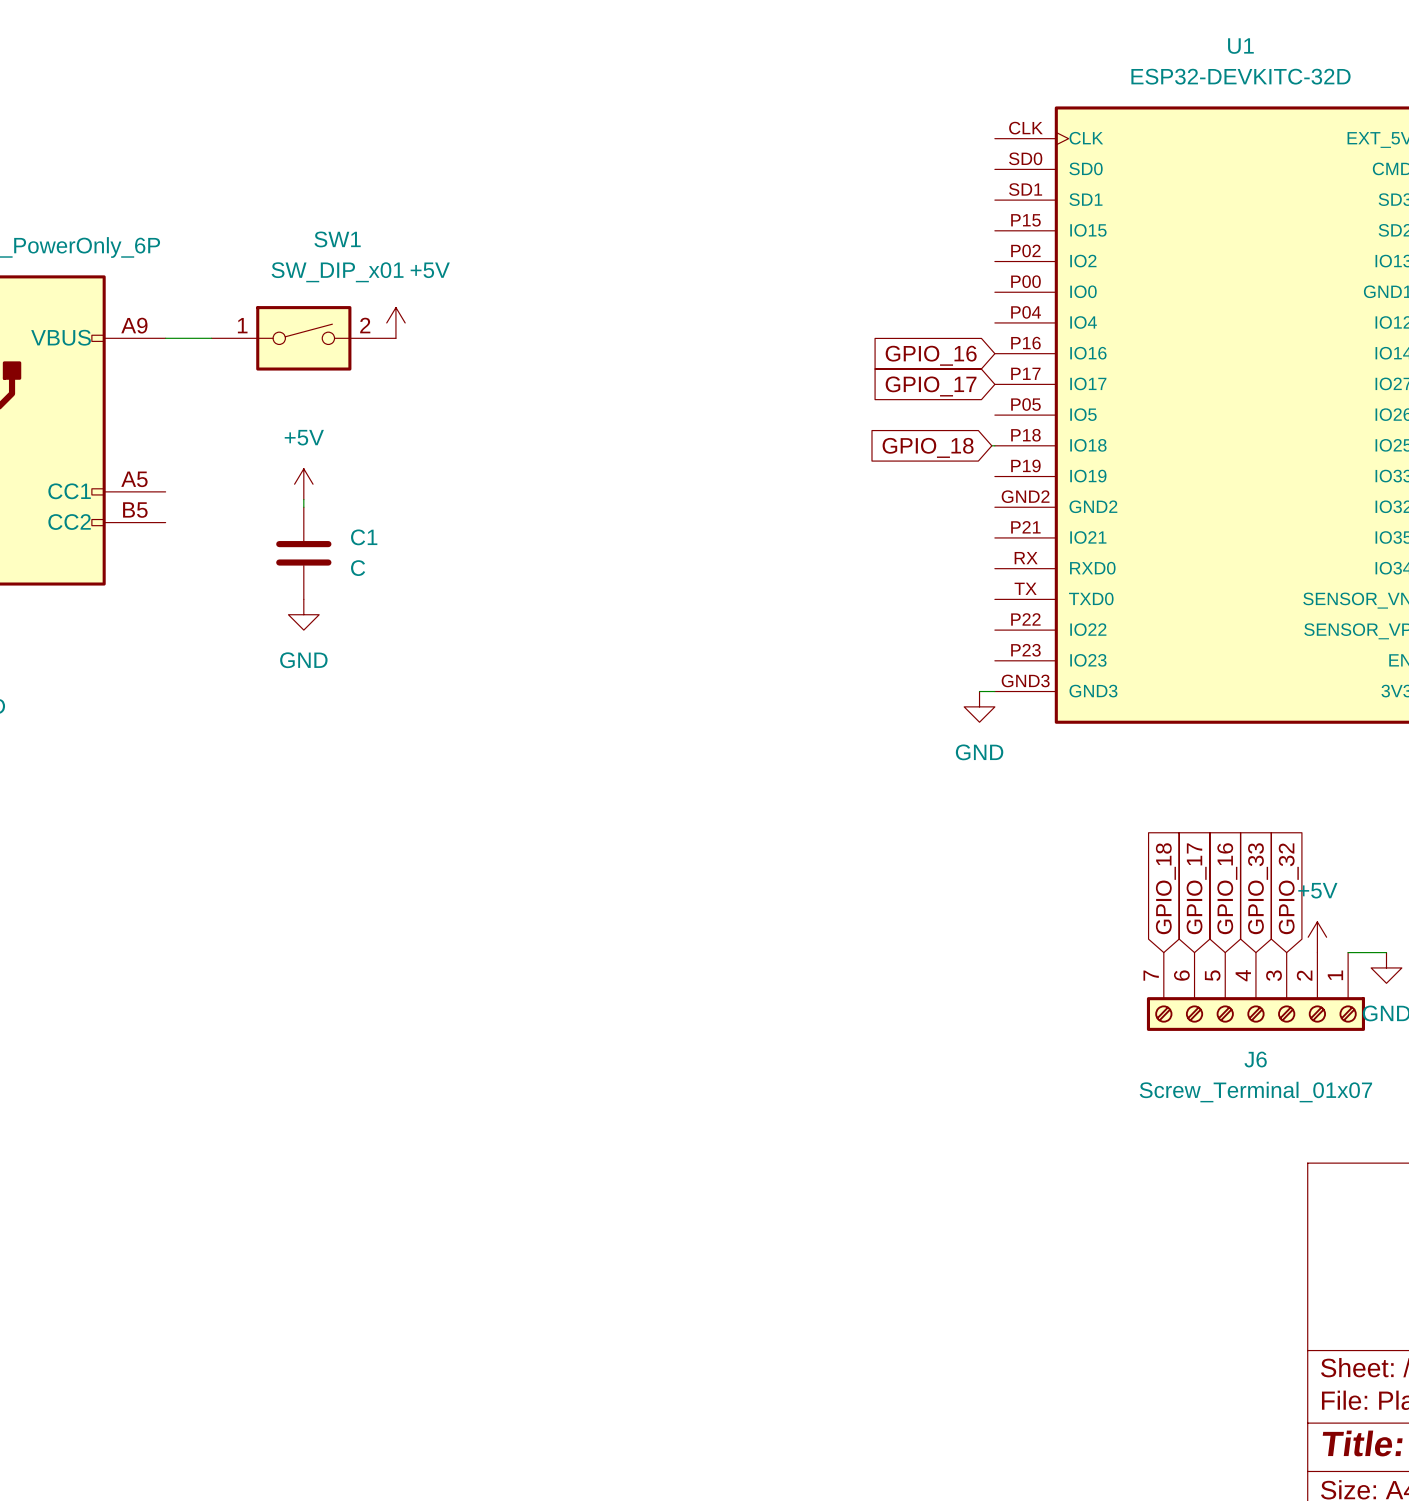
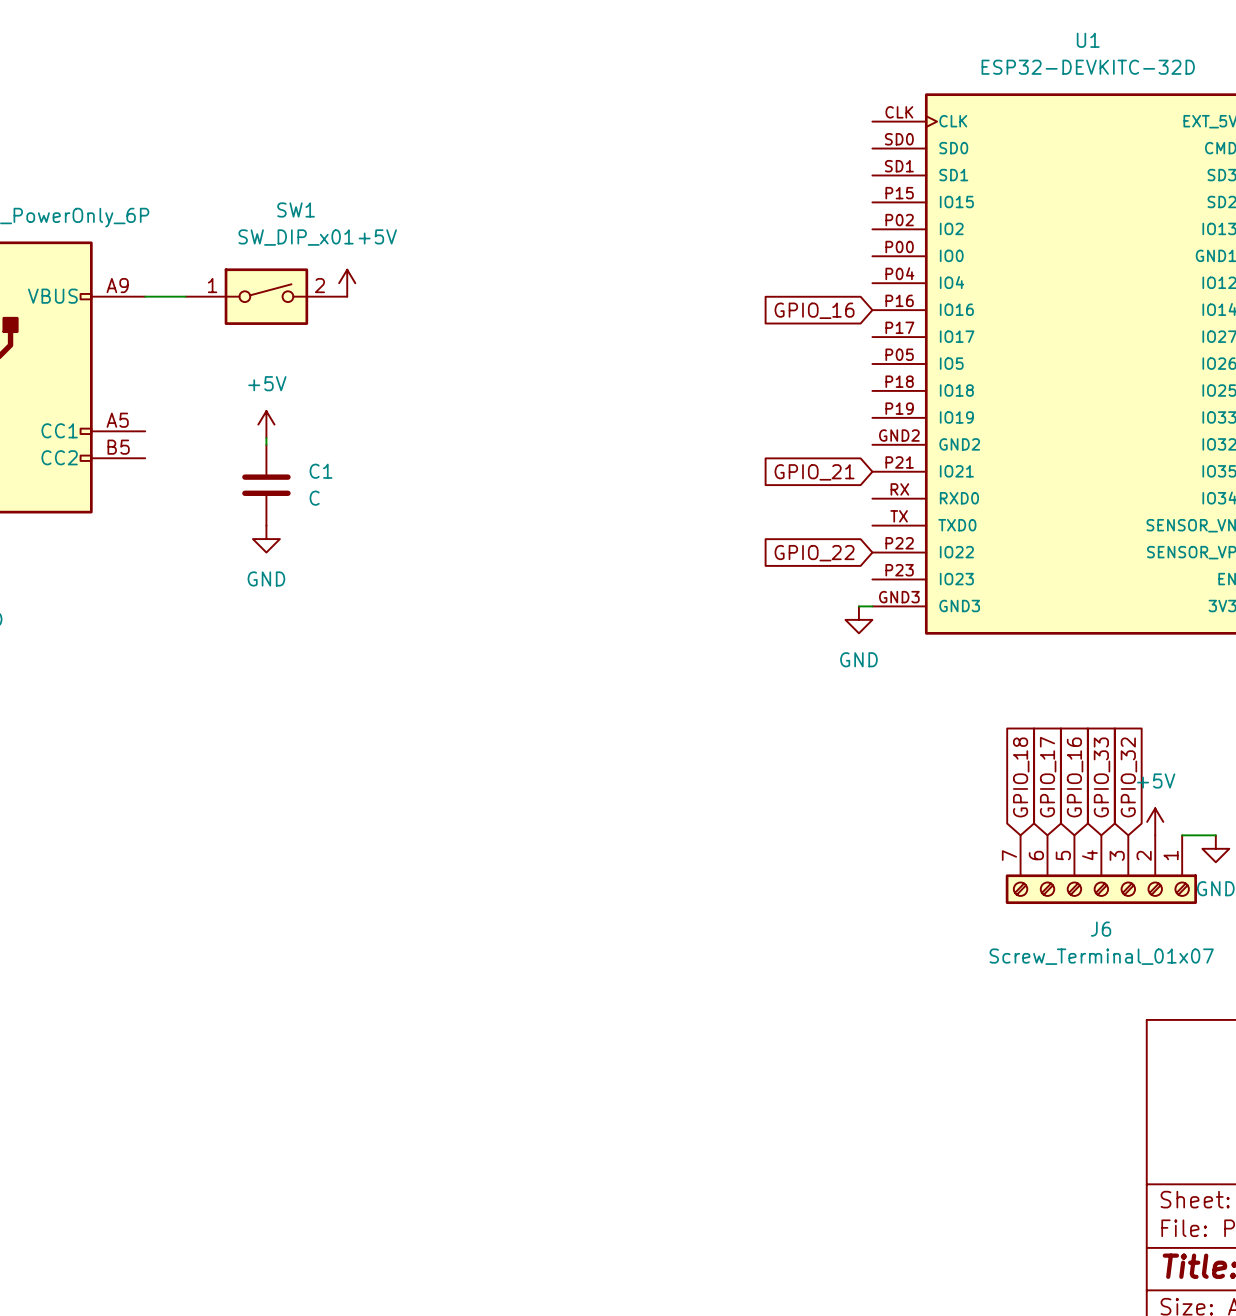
global label: GPIO_17 (931, 386) -> none
wire: (991, 445) (994, 445) -> none
global label: GPIO_18 (928, 447) -> none
global label: none -> GPIO_21 (814, 472)
global label: none -> GPIO_22 (814, 553)

